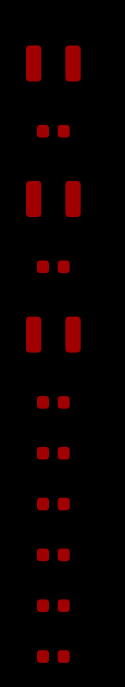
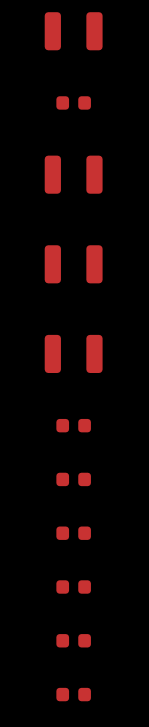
part: none -> (73, 31)
part: (53, 63) -> none
part position: (53, 131) -> (73, 102)
part: none -> (73, 174)
part: (53, 199) -> none
part: none -> (73, 264)
part: (53, 266) -> none

